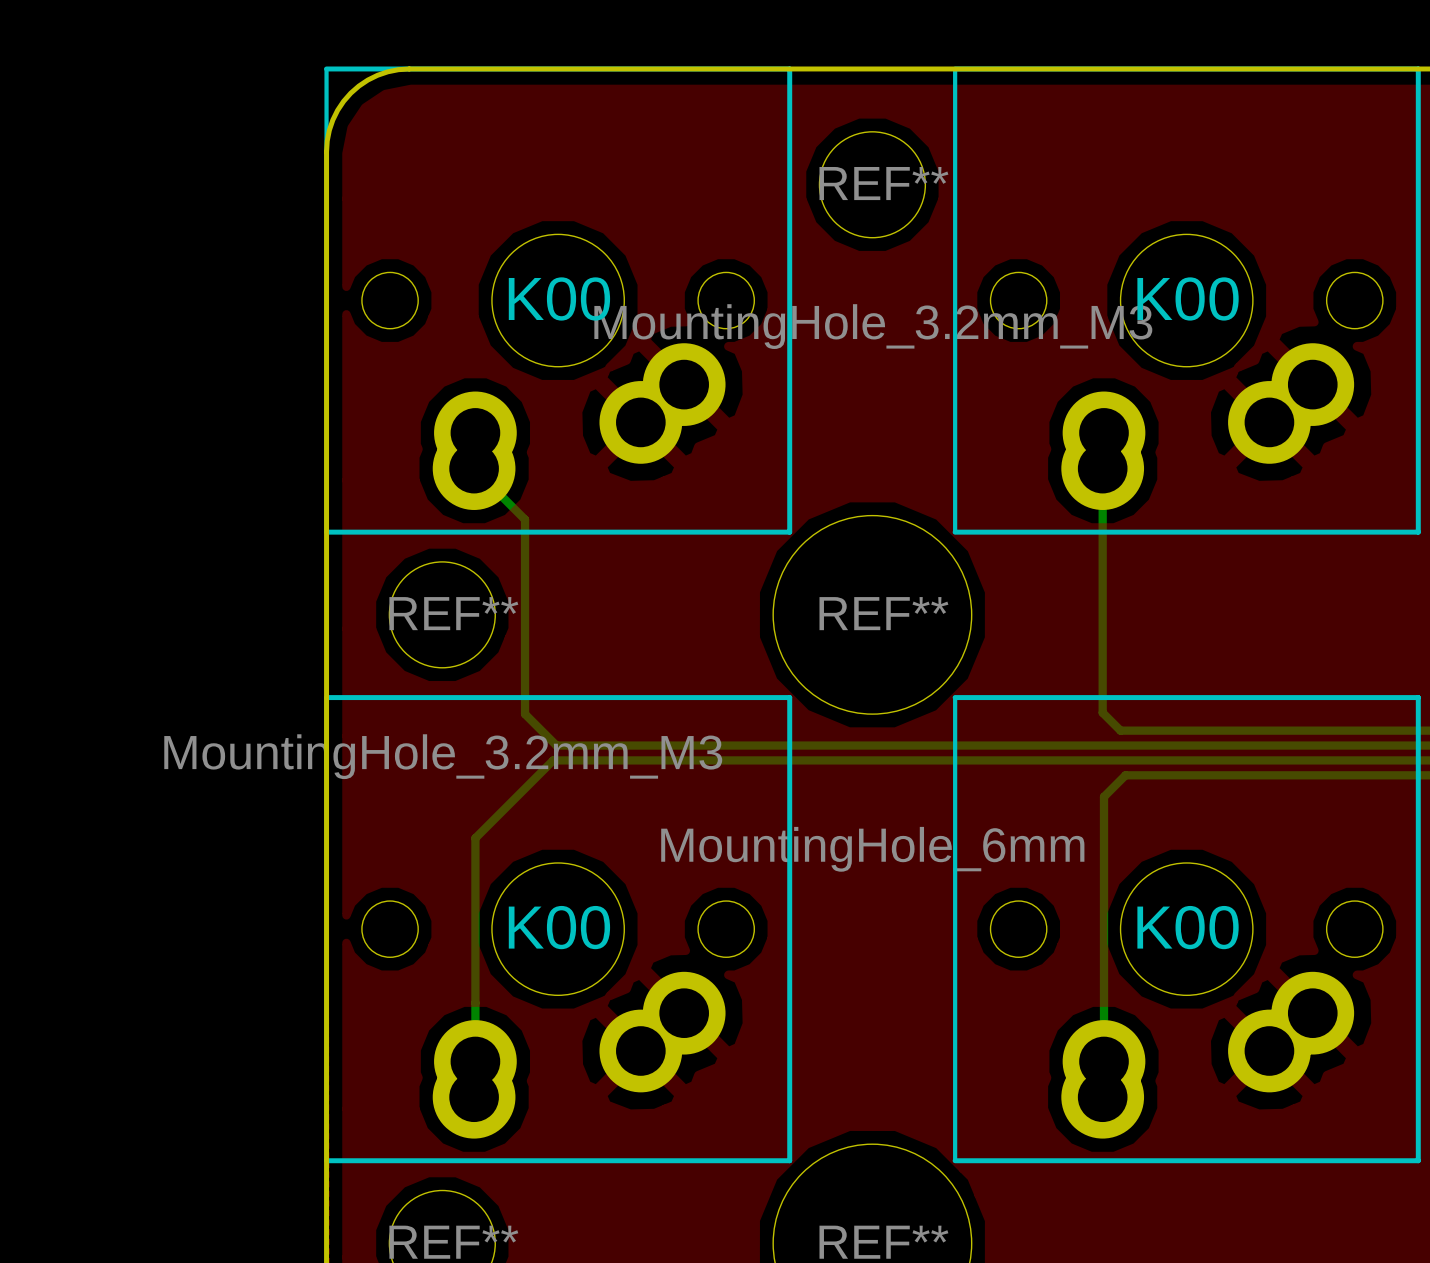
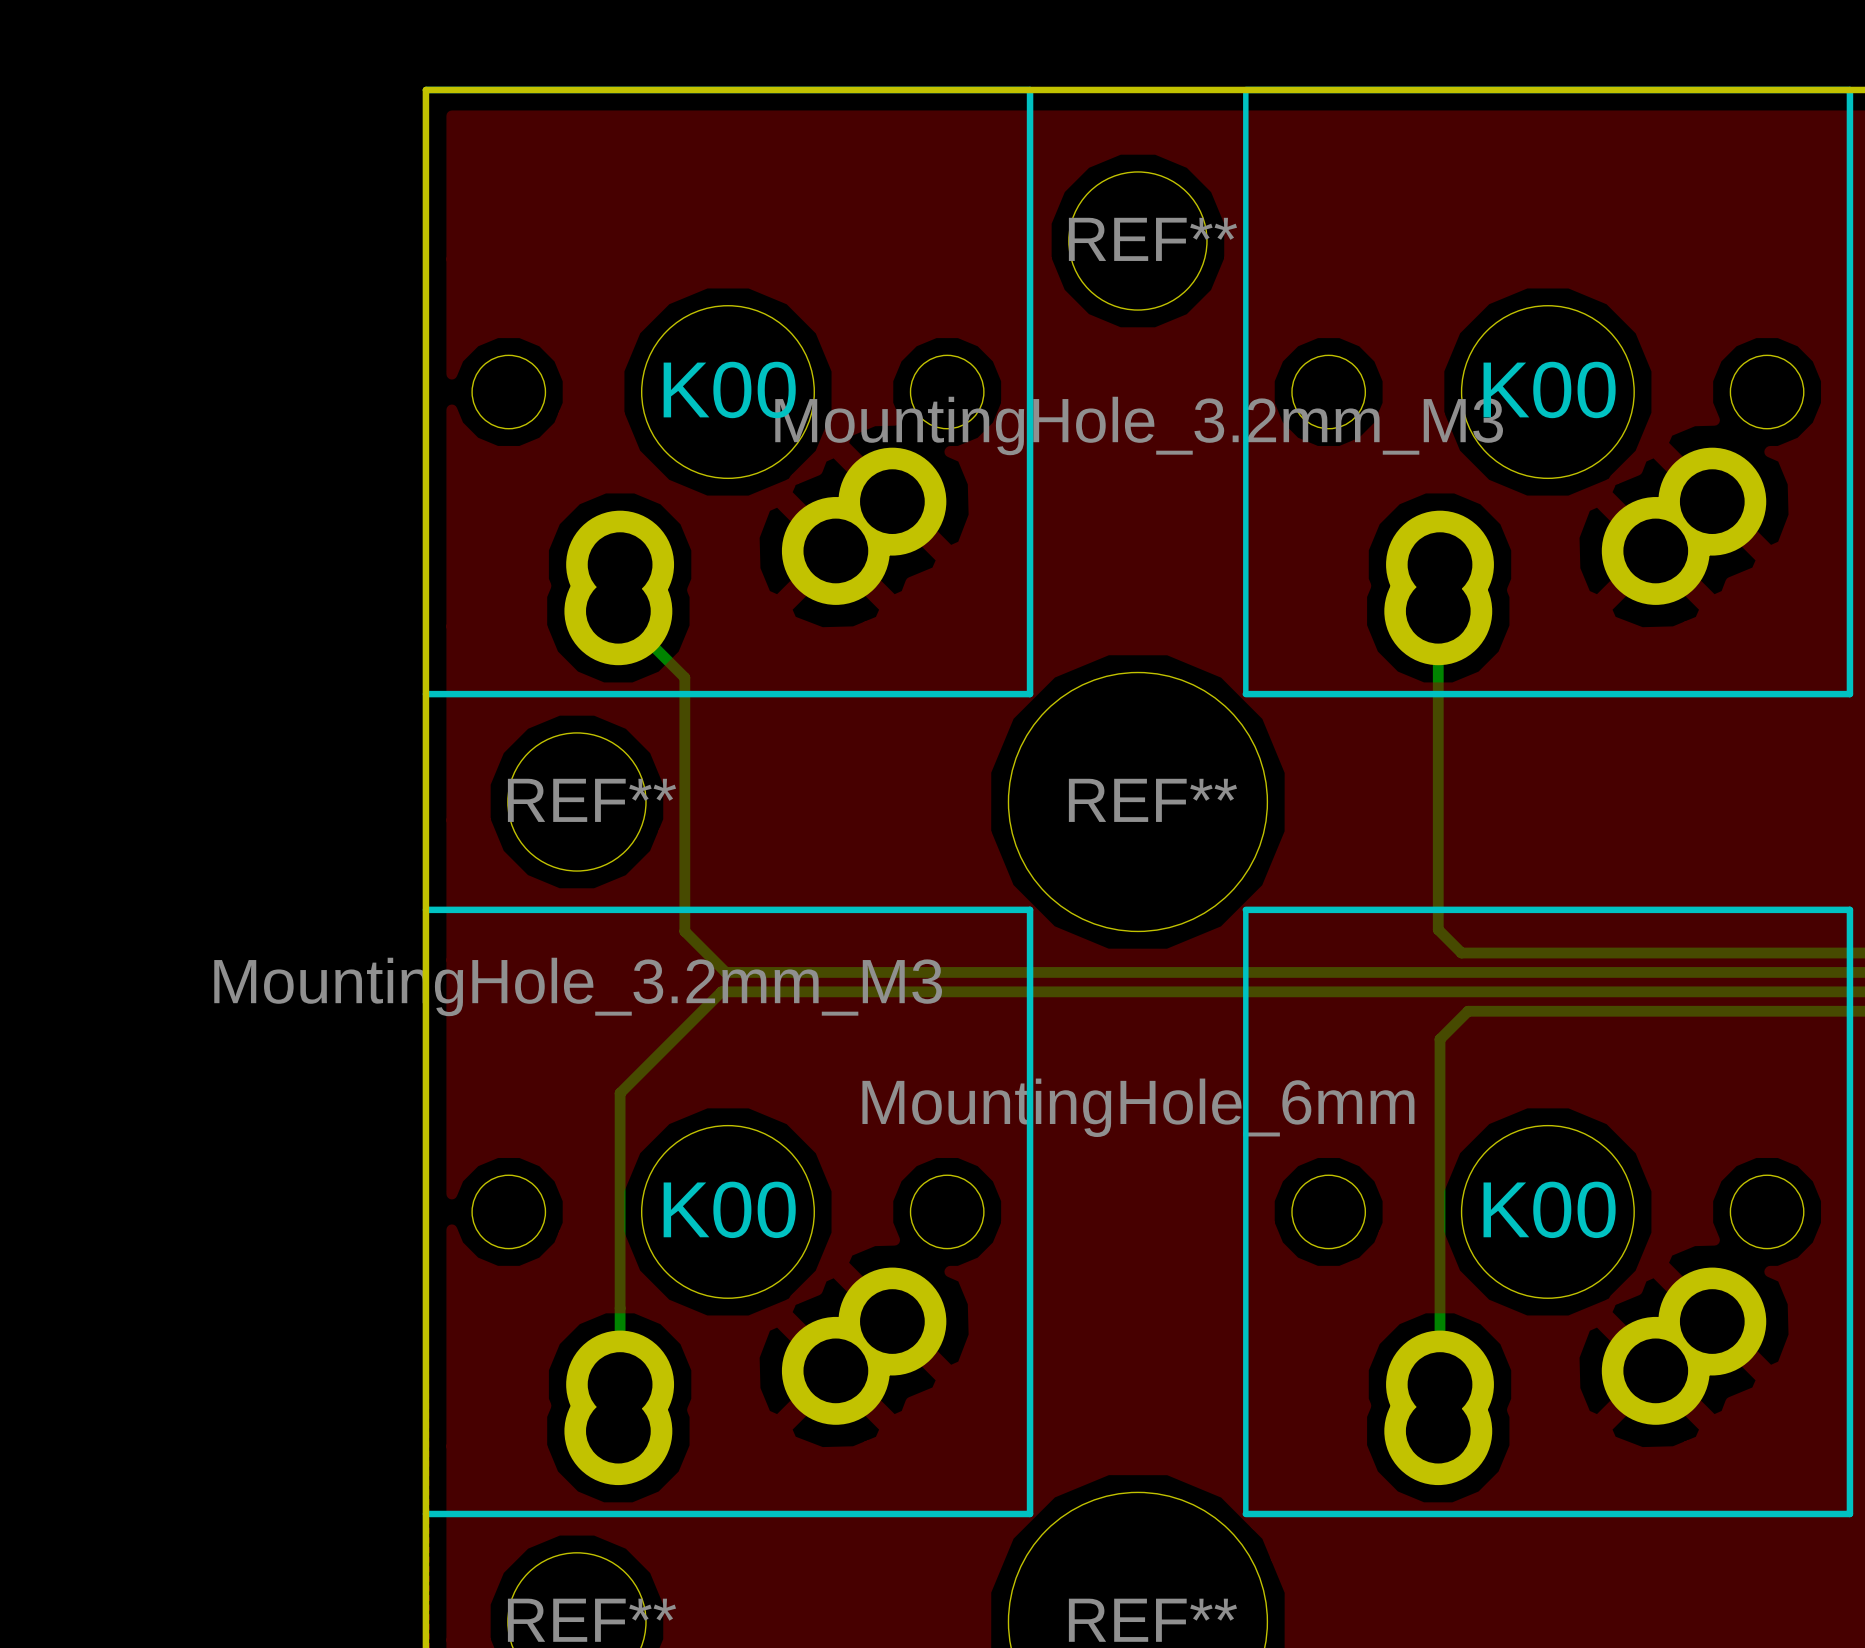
board edge: (409, 68) (377, 75) (350, 93) (332, 120) (326, 151) -> (533, 89) (425, 89) (425, 197)

